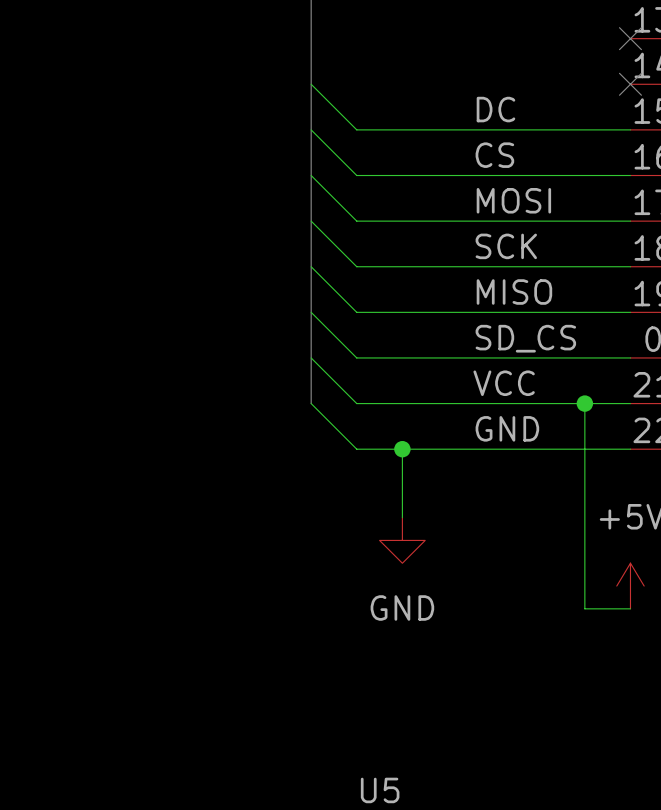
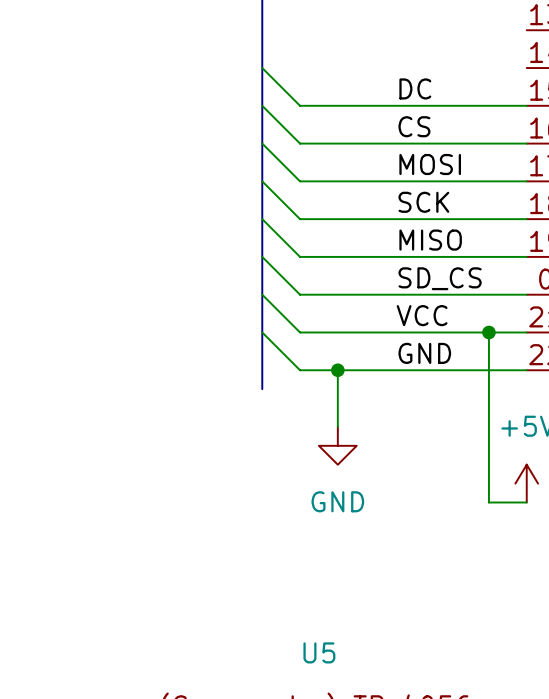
no-connect mark: (630, 38) -> none
no-connect mark: (630, 84) -> none
bus: none -> (262, 332) (262, 389)

